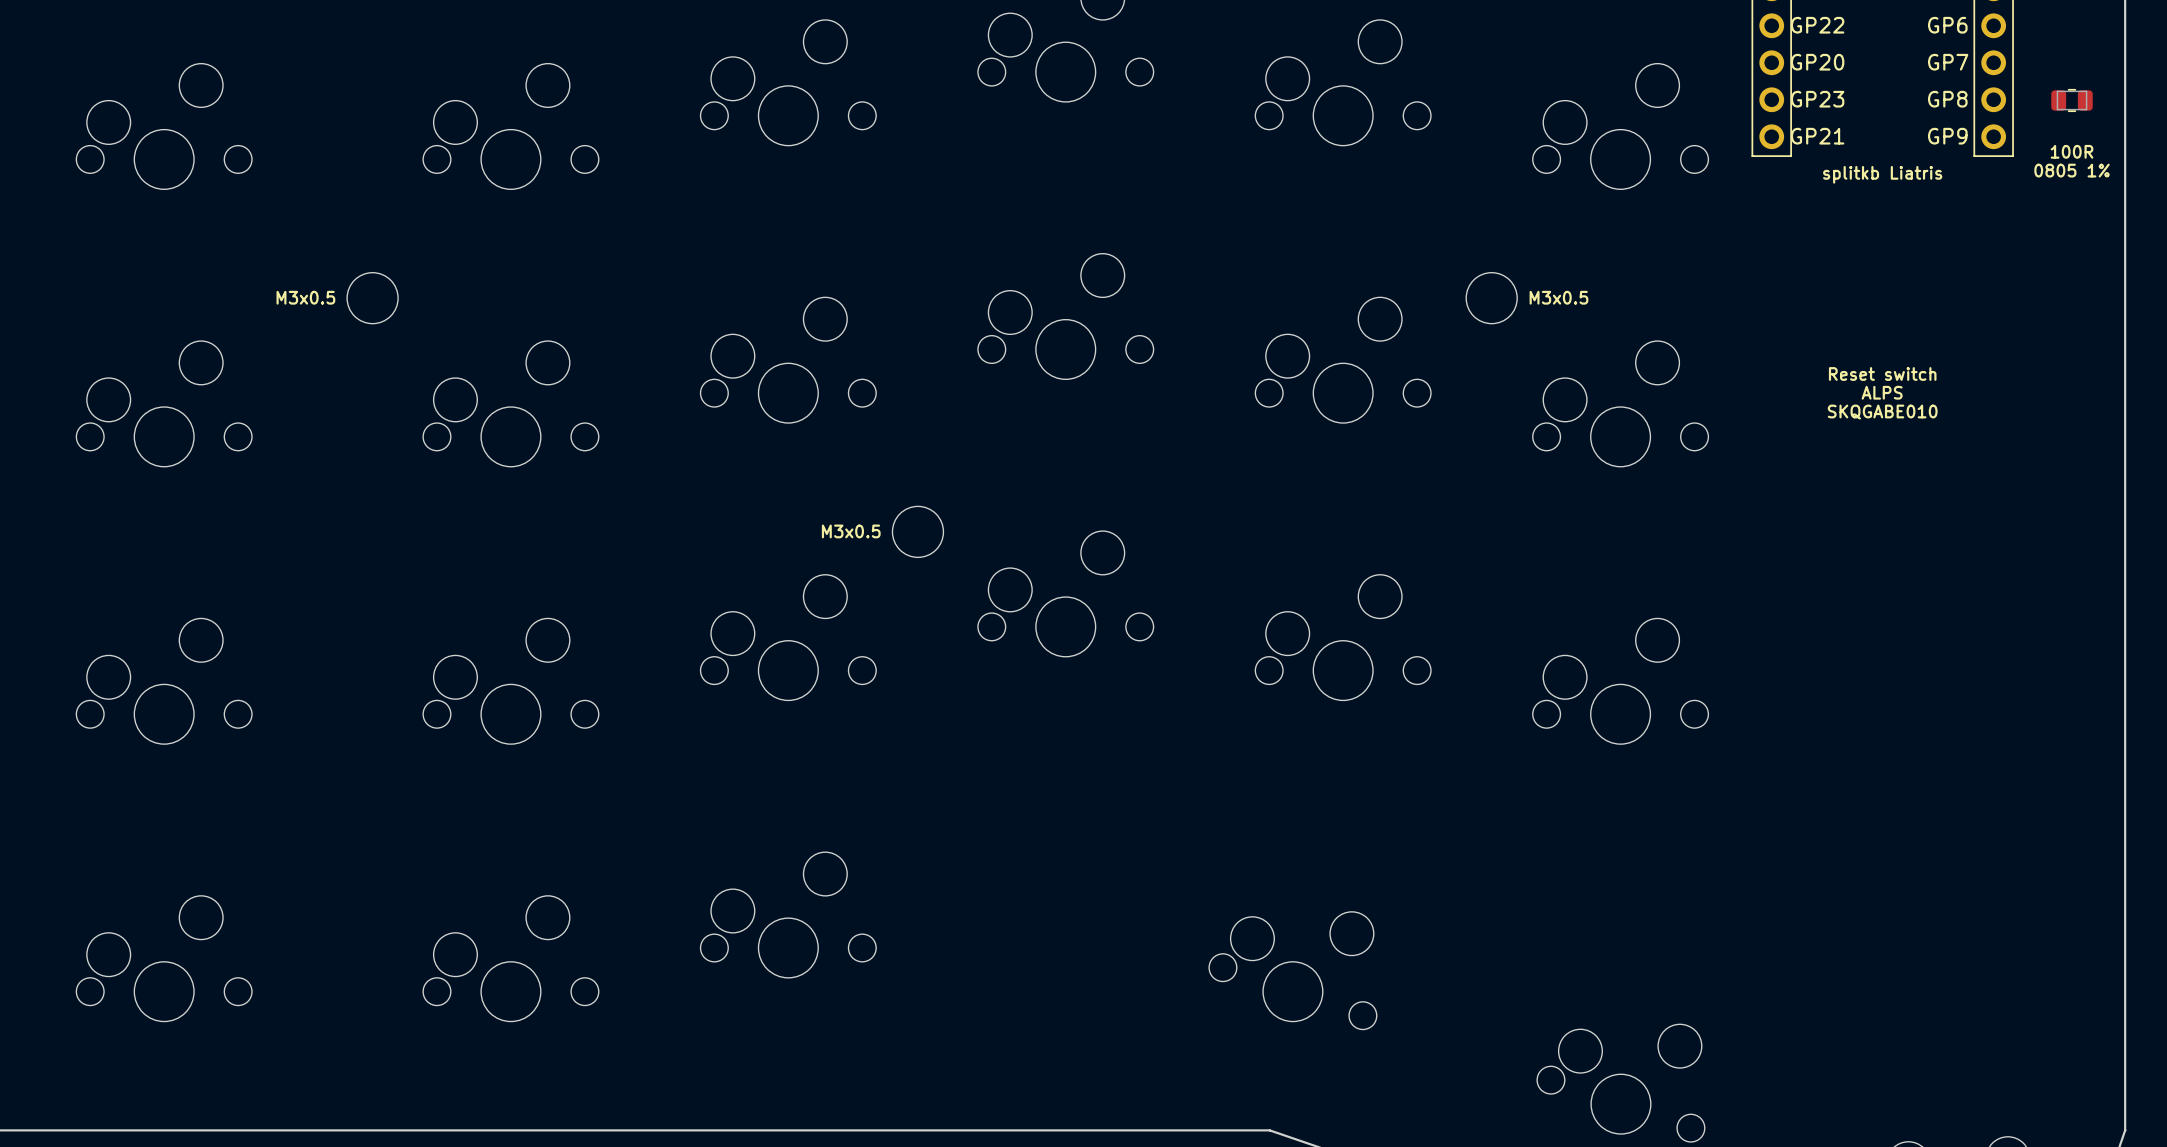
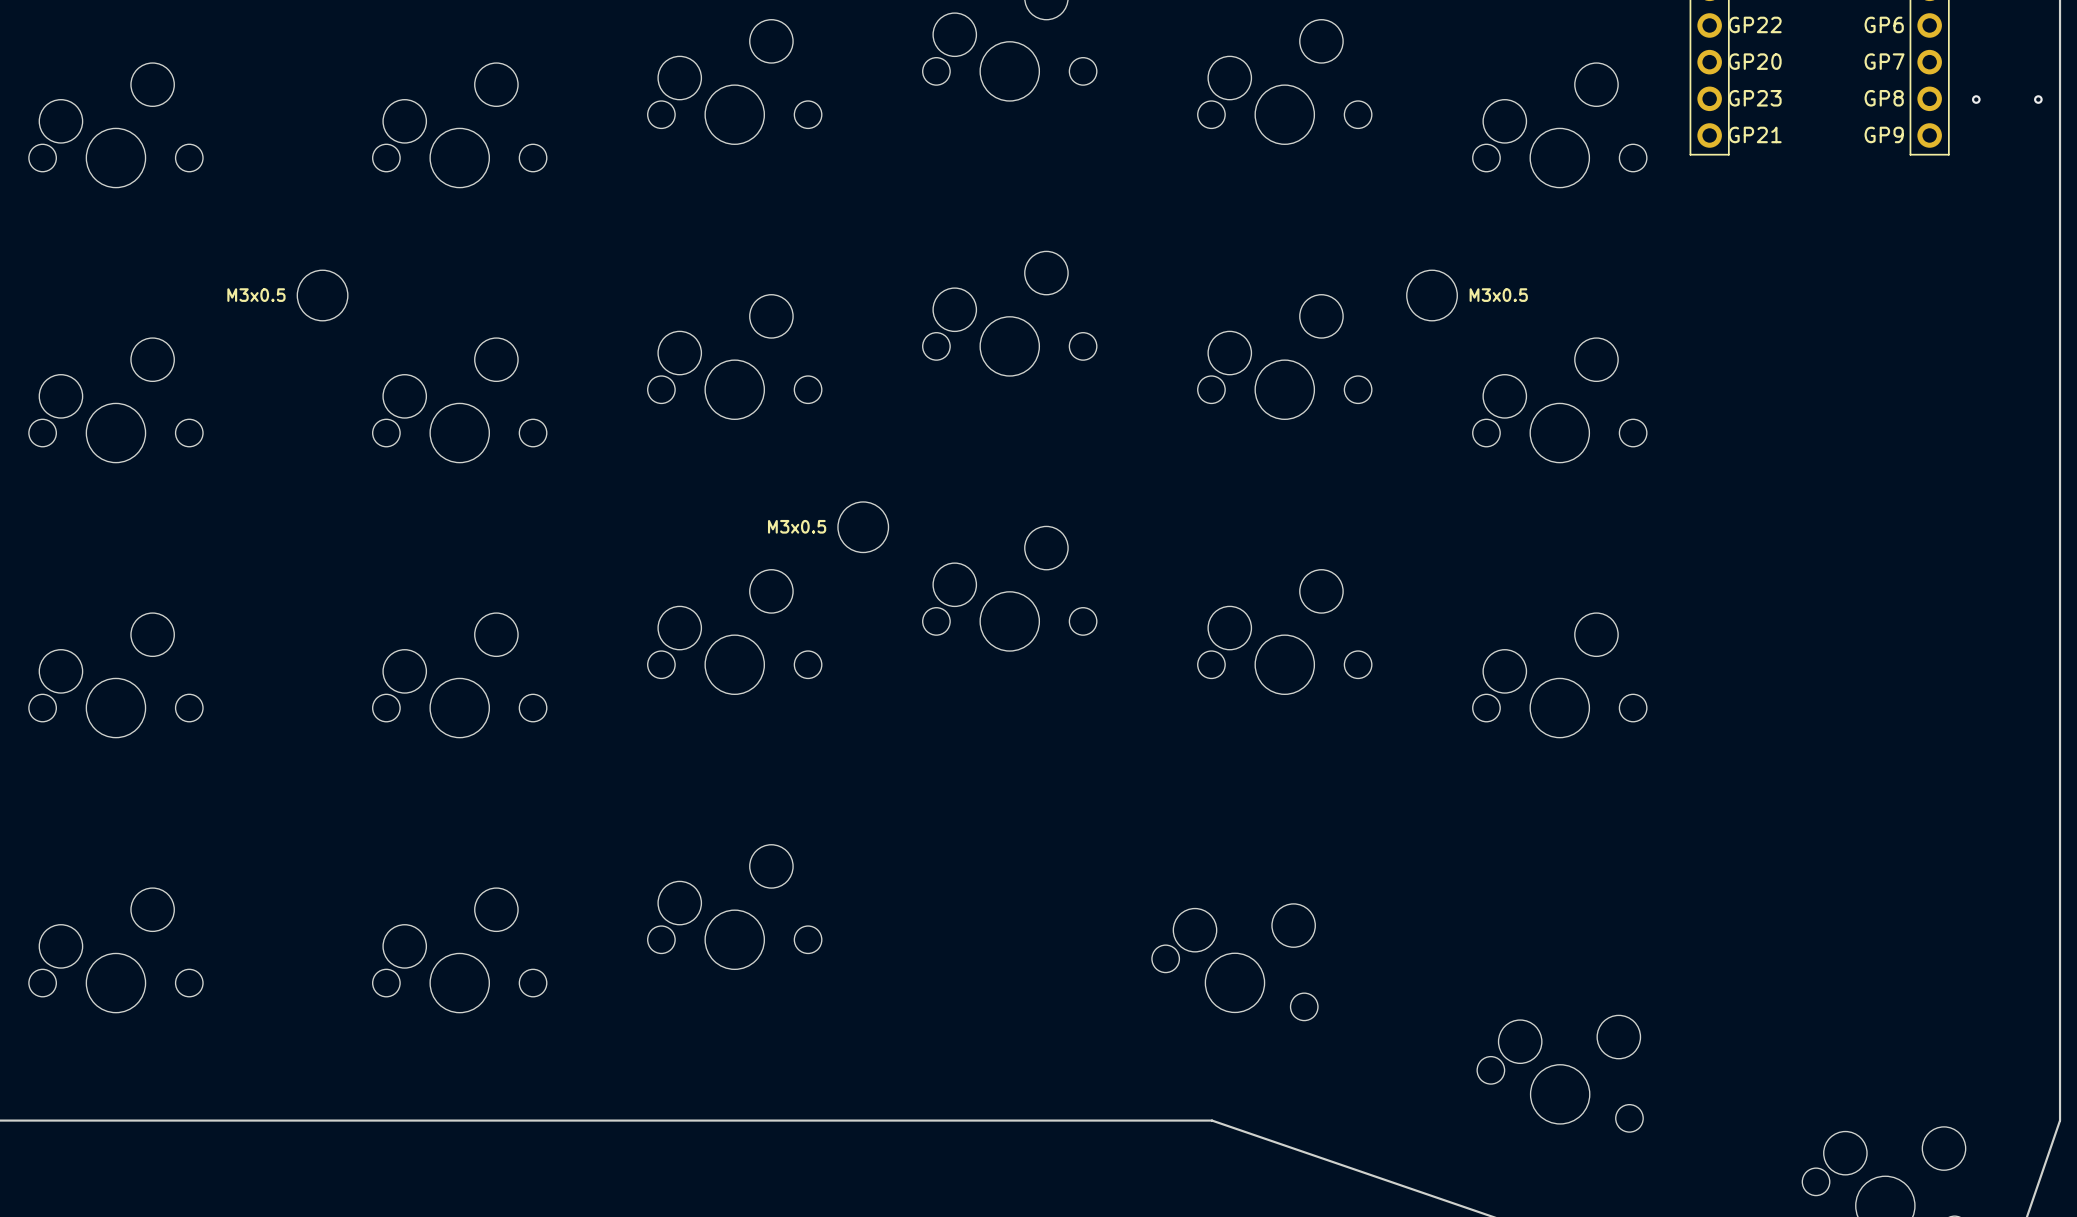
via: none -> (1976, 99)
part: (2072, 100) -> none
via: none -> (2038, 99)
text: 100R (2072, 151) -> none
text: 0805 1% (2072, 170) -> none
text: splitkb Liatris (1882, 174) -> none
text: Reset switch (1882, 373) -> none
text: ALPS (1882, 392) -> none
text: SKQGABE010 (1882, 412) -> none

